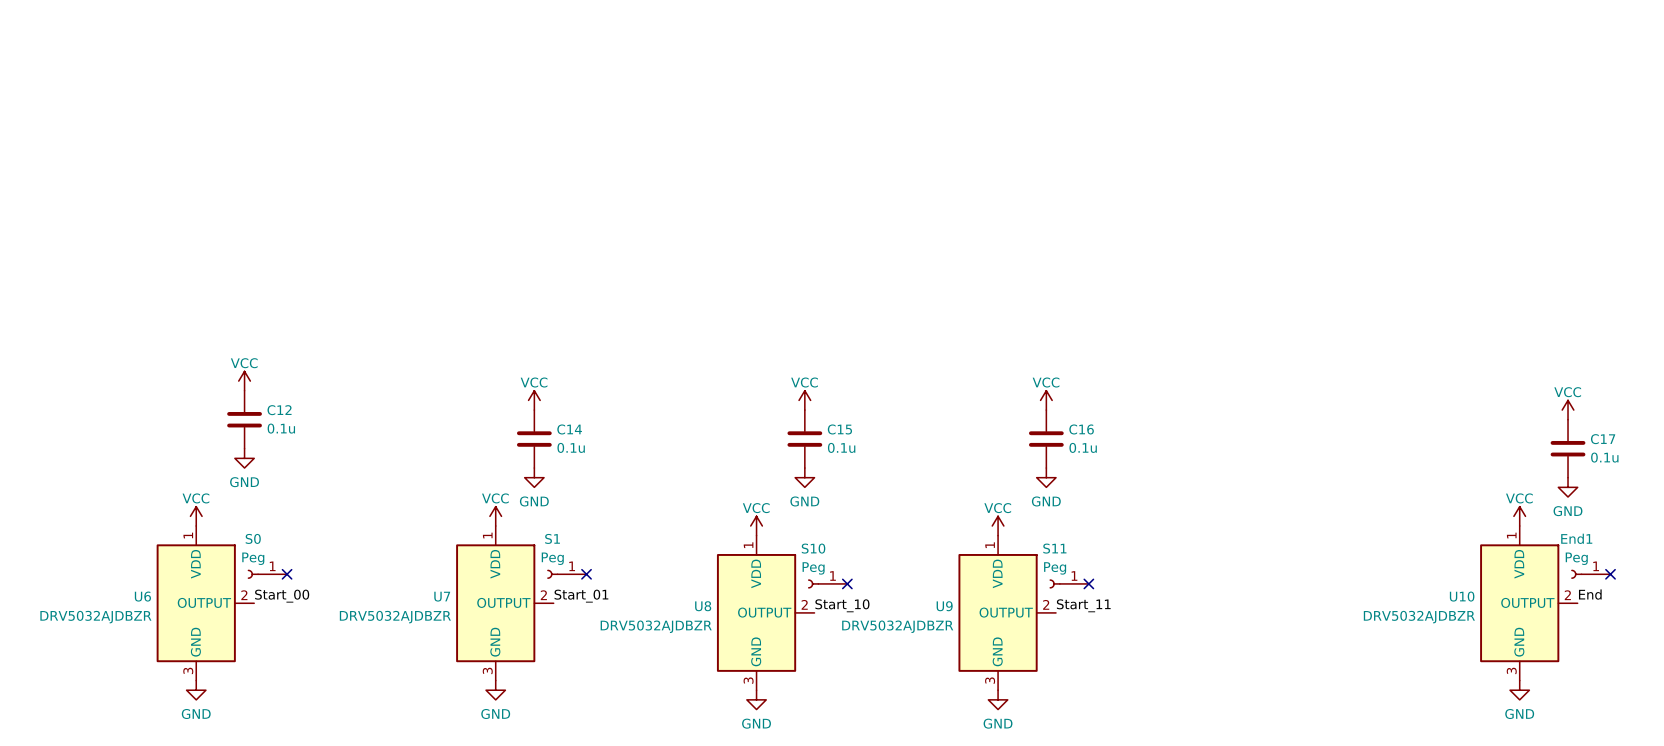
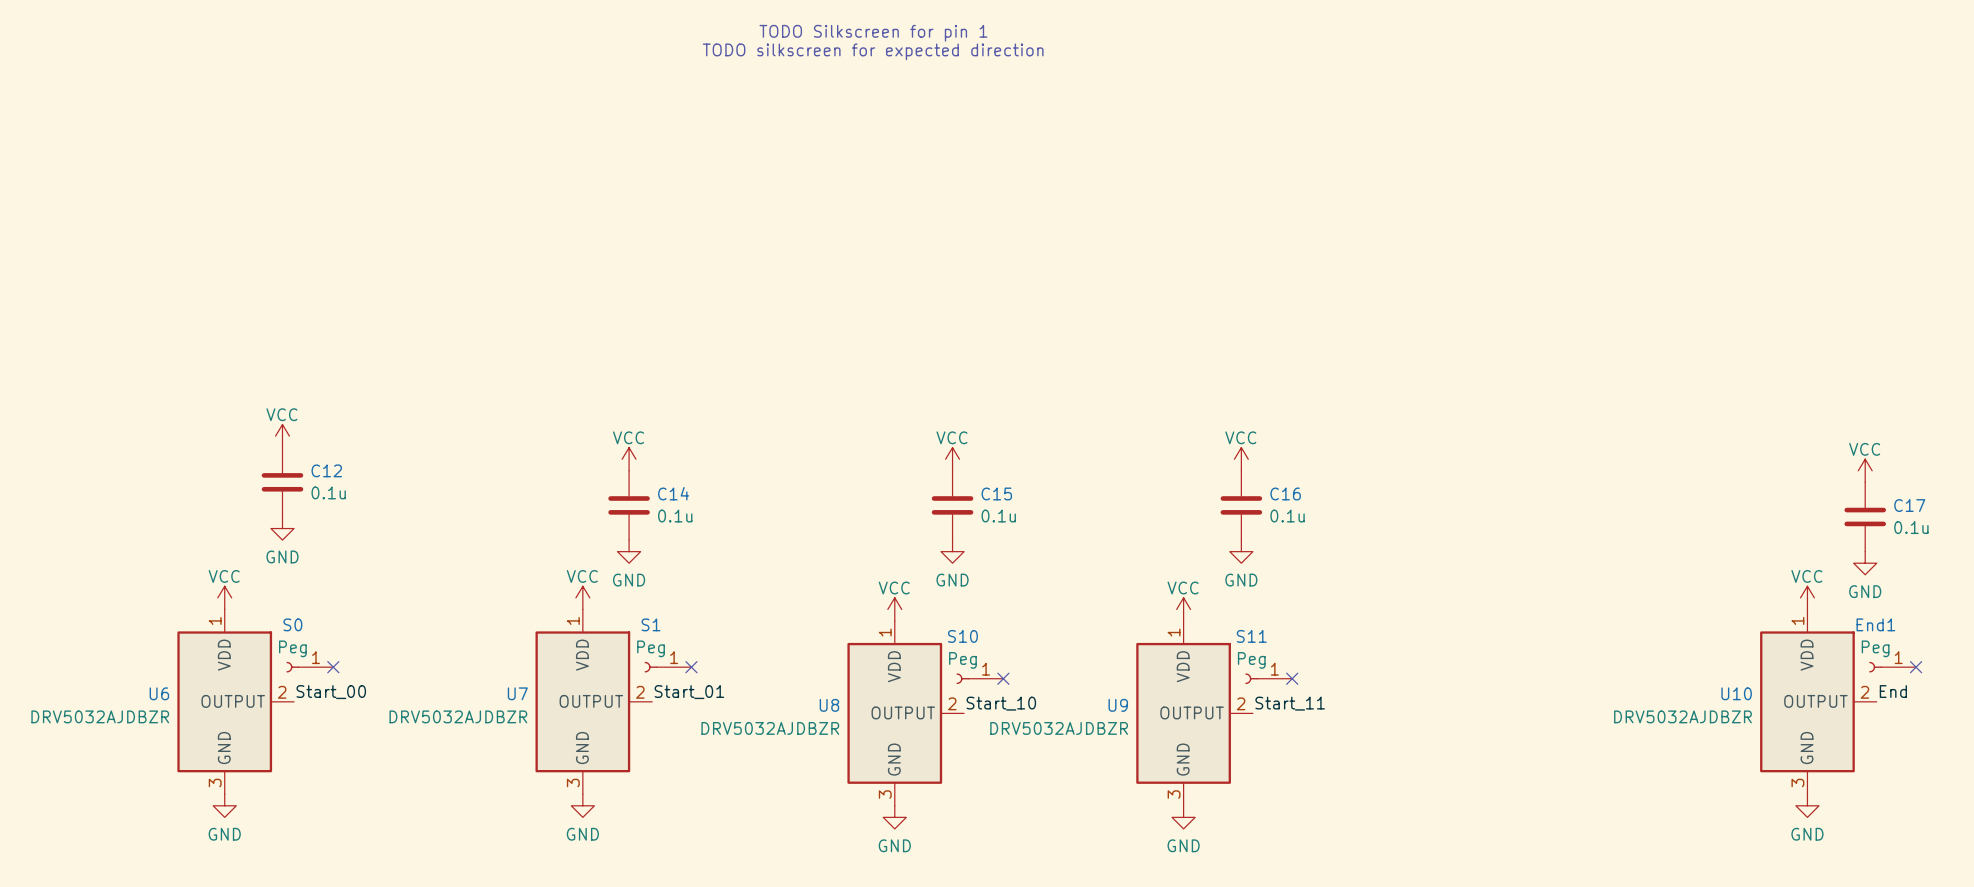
text: none -> TODO Silkscreen for pin 1 (873, 33)
text: none -> TODO silkscreen for expected direction (873, 51)

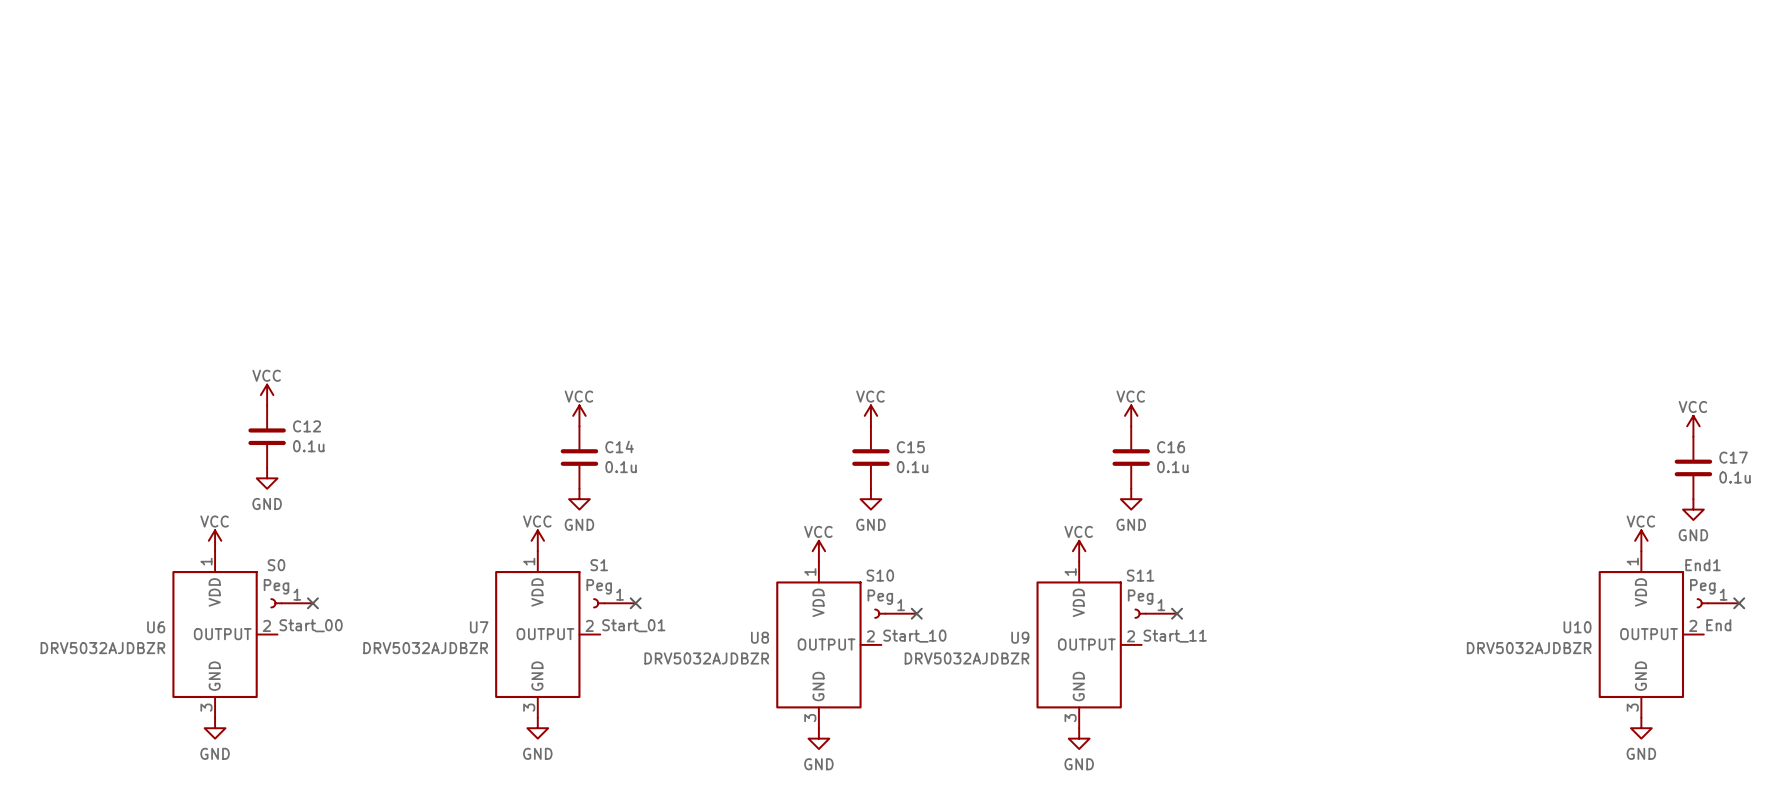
text: TODO Silkscreen for pin 1 (873, 33) -> none
text: TODO silkscreen for expected direction (873, 51) -> none

